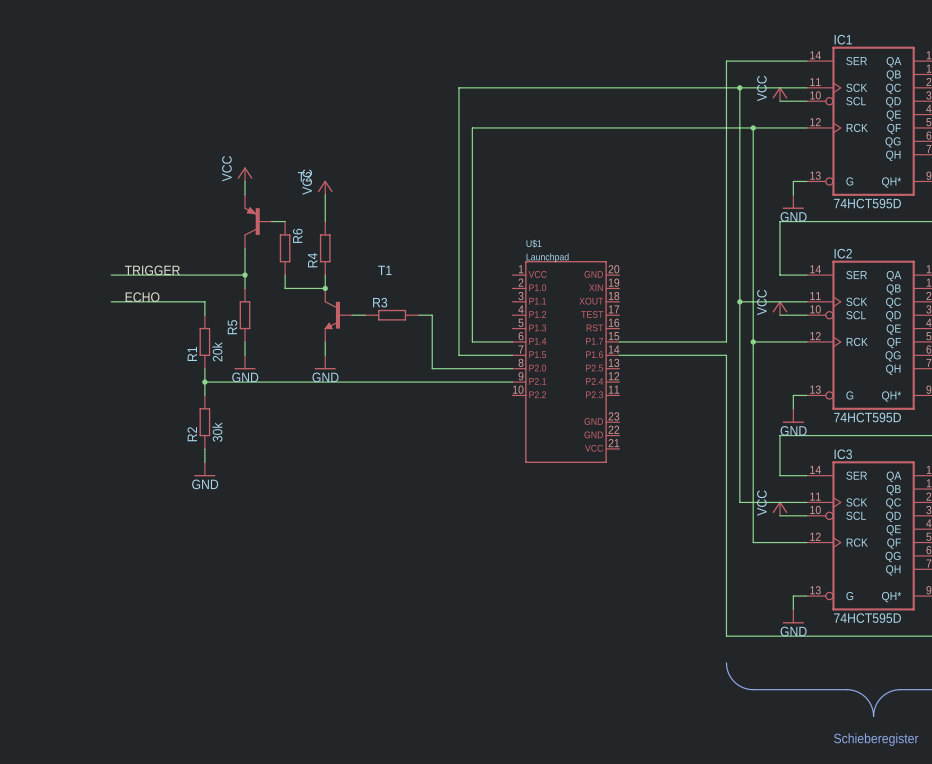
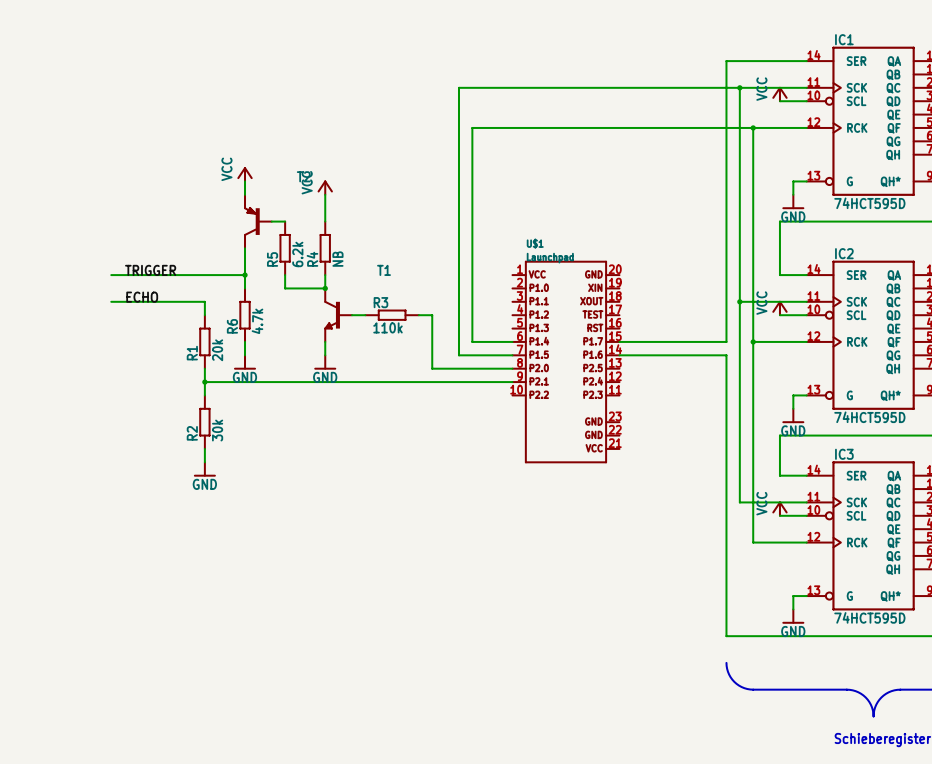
R6 name: R6 (297, 235) -> R5 (272, 259)
R6 value: none -> 6.2k (297, 254)
R4 value: none -> NB (337, 259)
R5 value: none -> 4.7k (257, 321)
R5 name: R5 (232, 327) -> R6 (232, 326)
R3 value: none -> 110k (388, 327)

